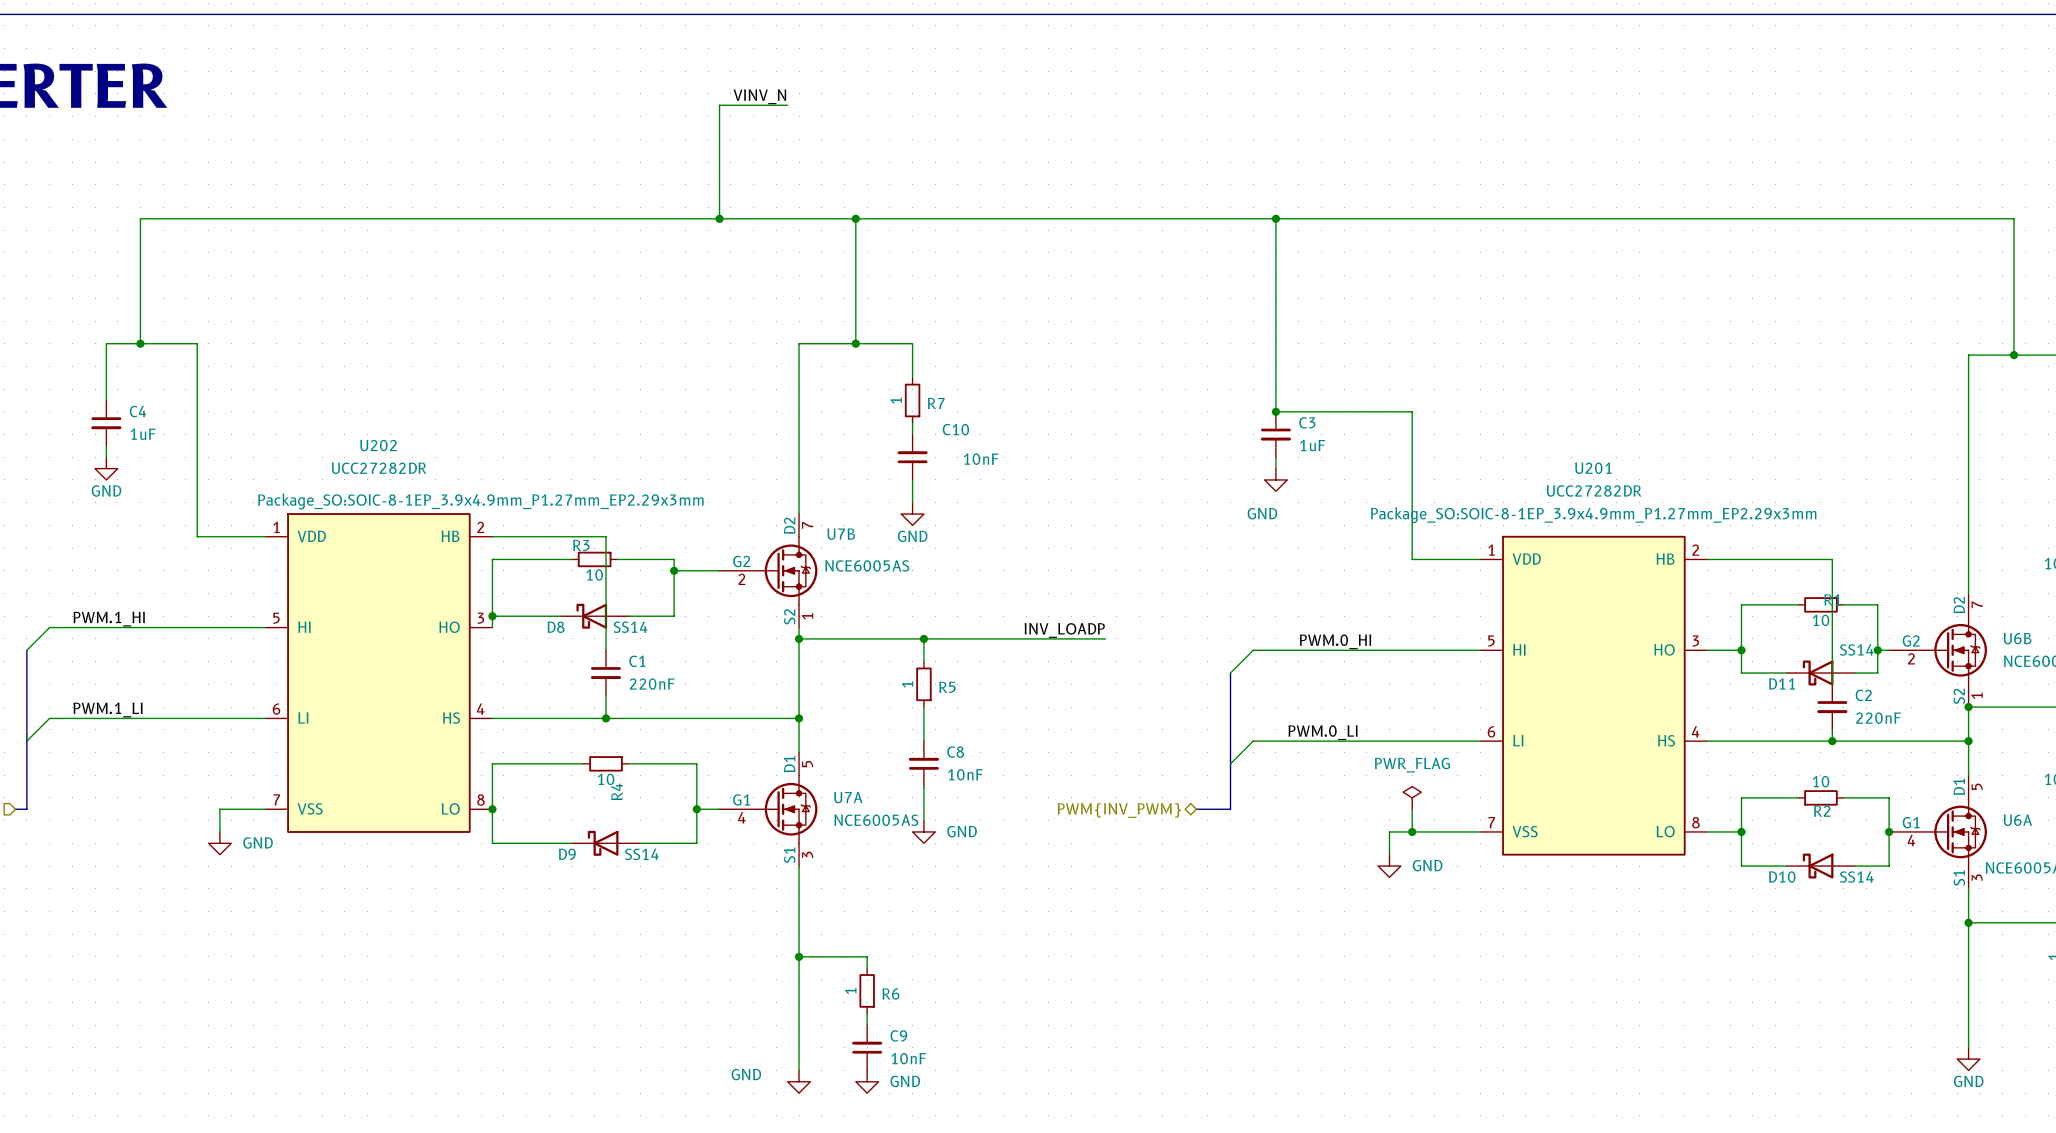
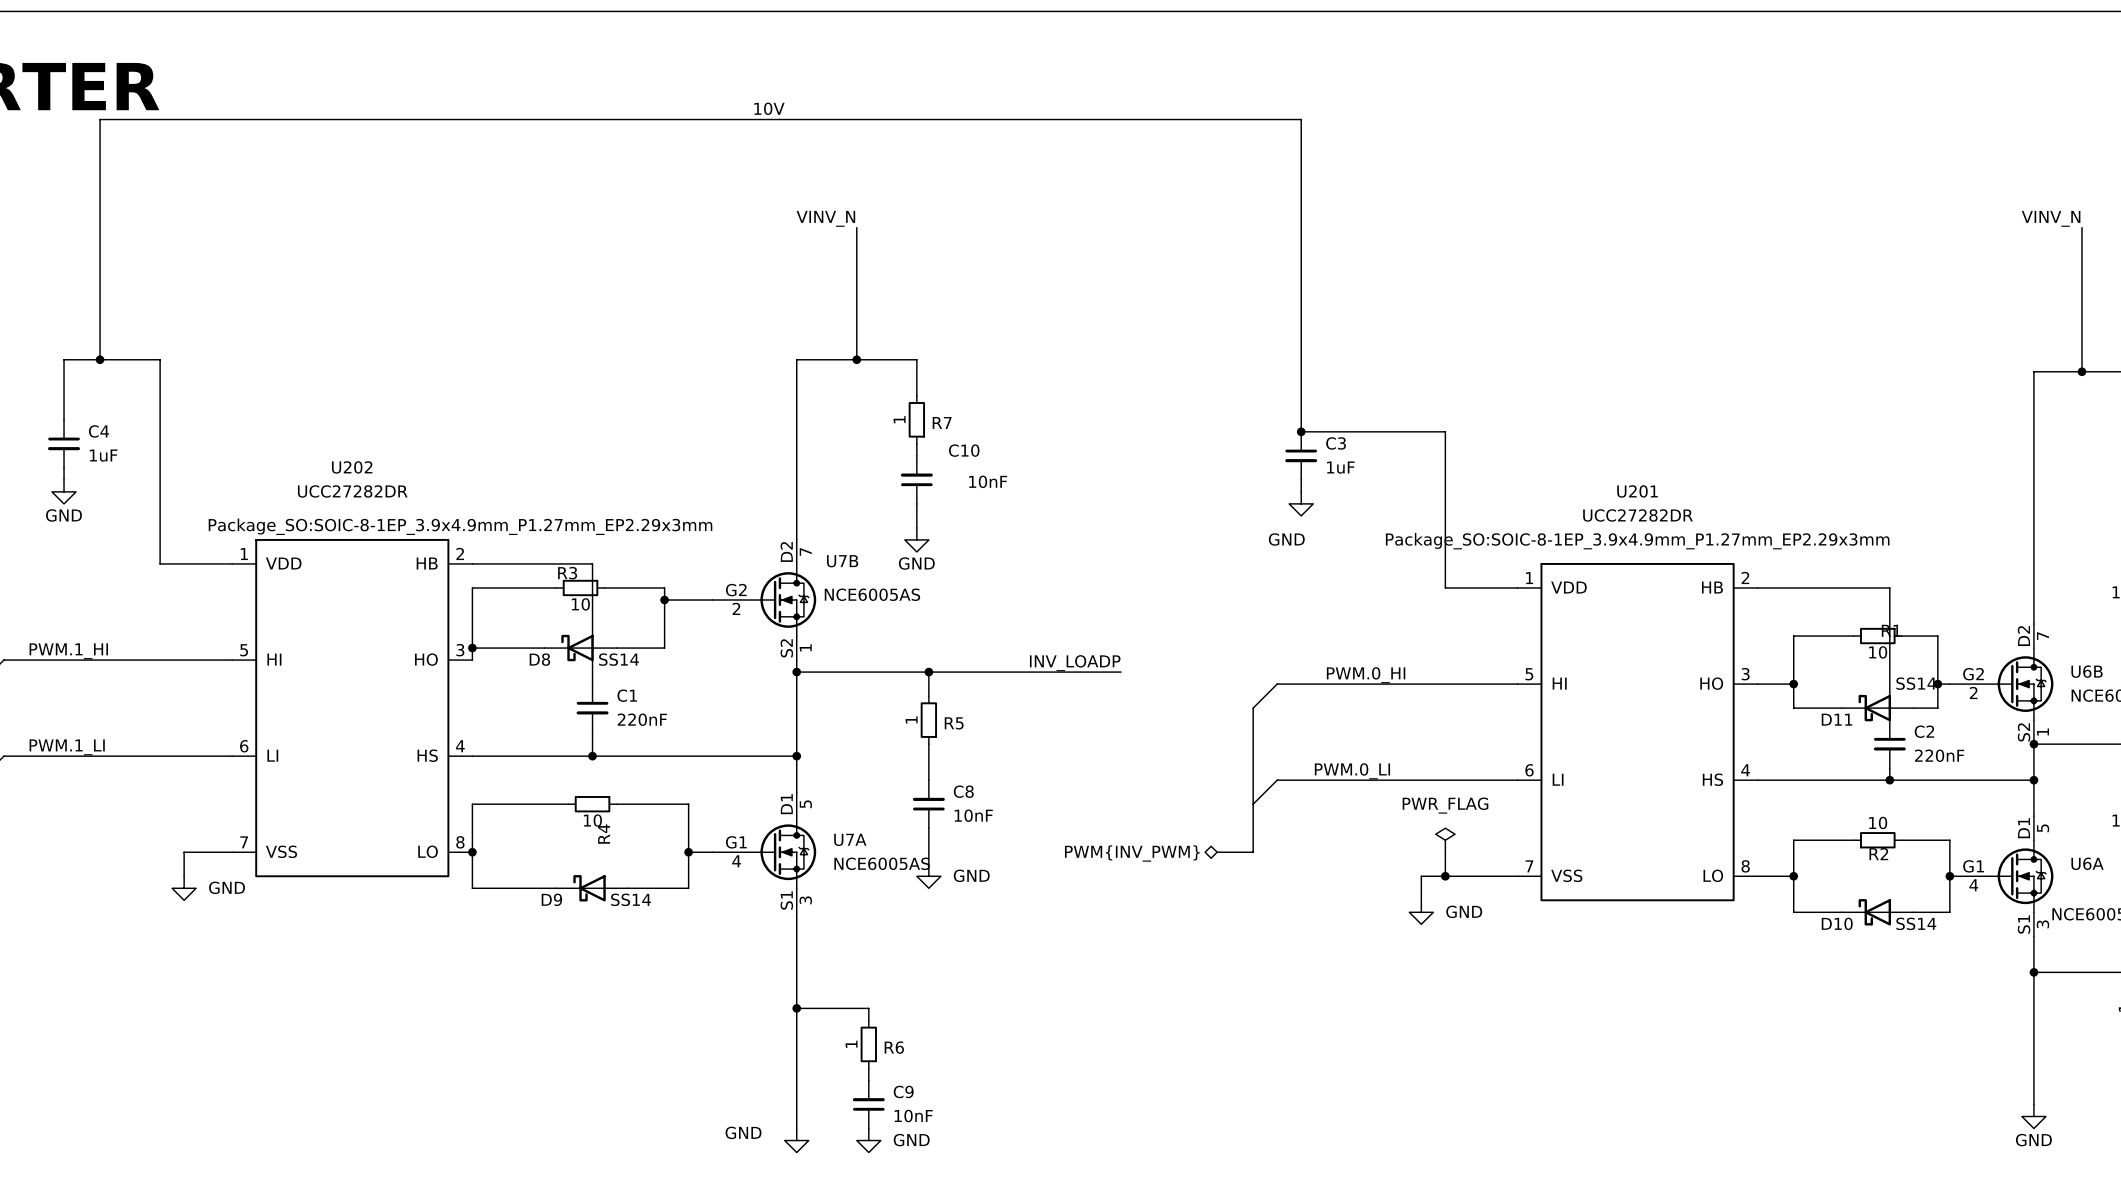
label position: VINV_N (759, 96) -> VINV_N (825, 218)
wire: (787, 105) (719, 105) (719, 218) -> none
label: none -> 10V (769, 108)
label: none -> VINV_N (2051, 218)
wire: (140, 218) (2014, 218) -> (100, 227) (100, 119) (1301, 119) (1301, 227)
junction: (719, 218) -> none
junction: (855, 218) -> none
junction: (1275, 218) -> none

